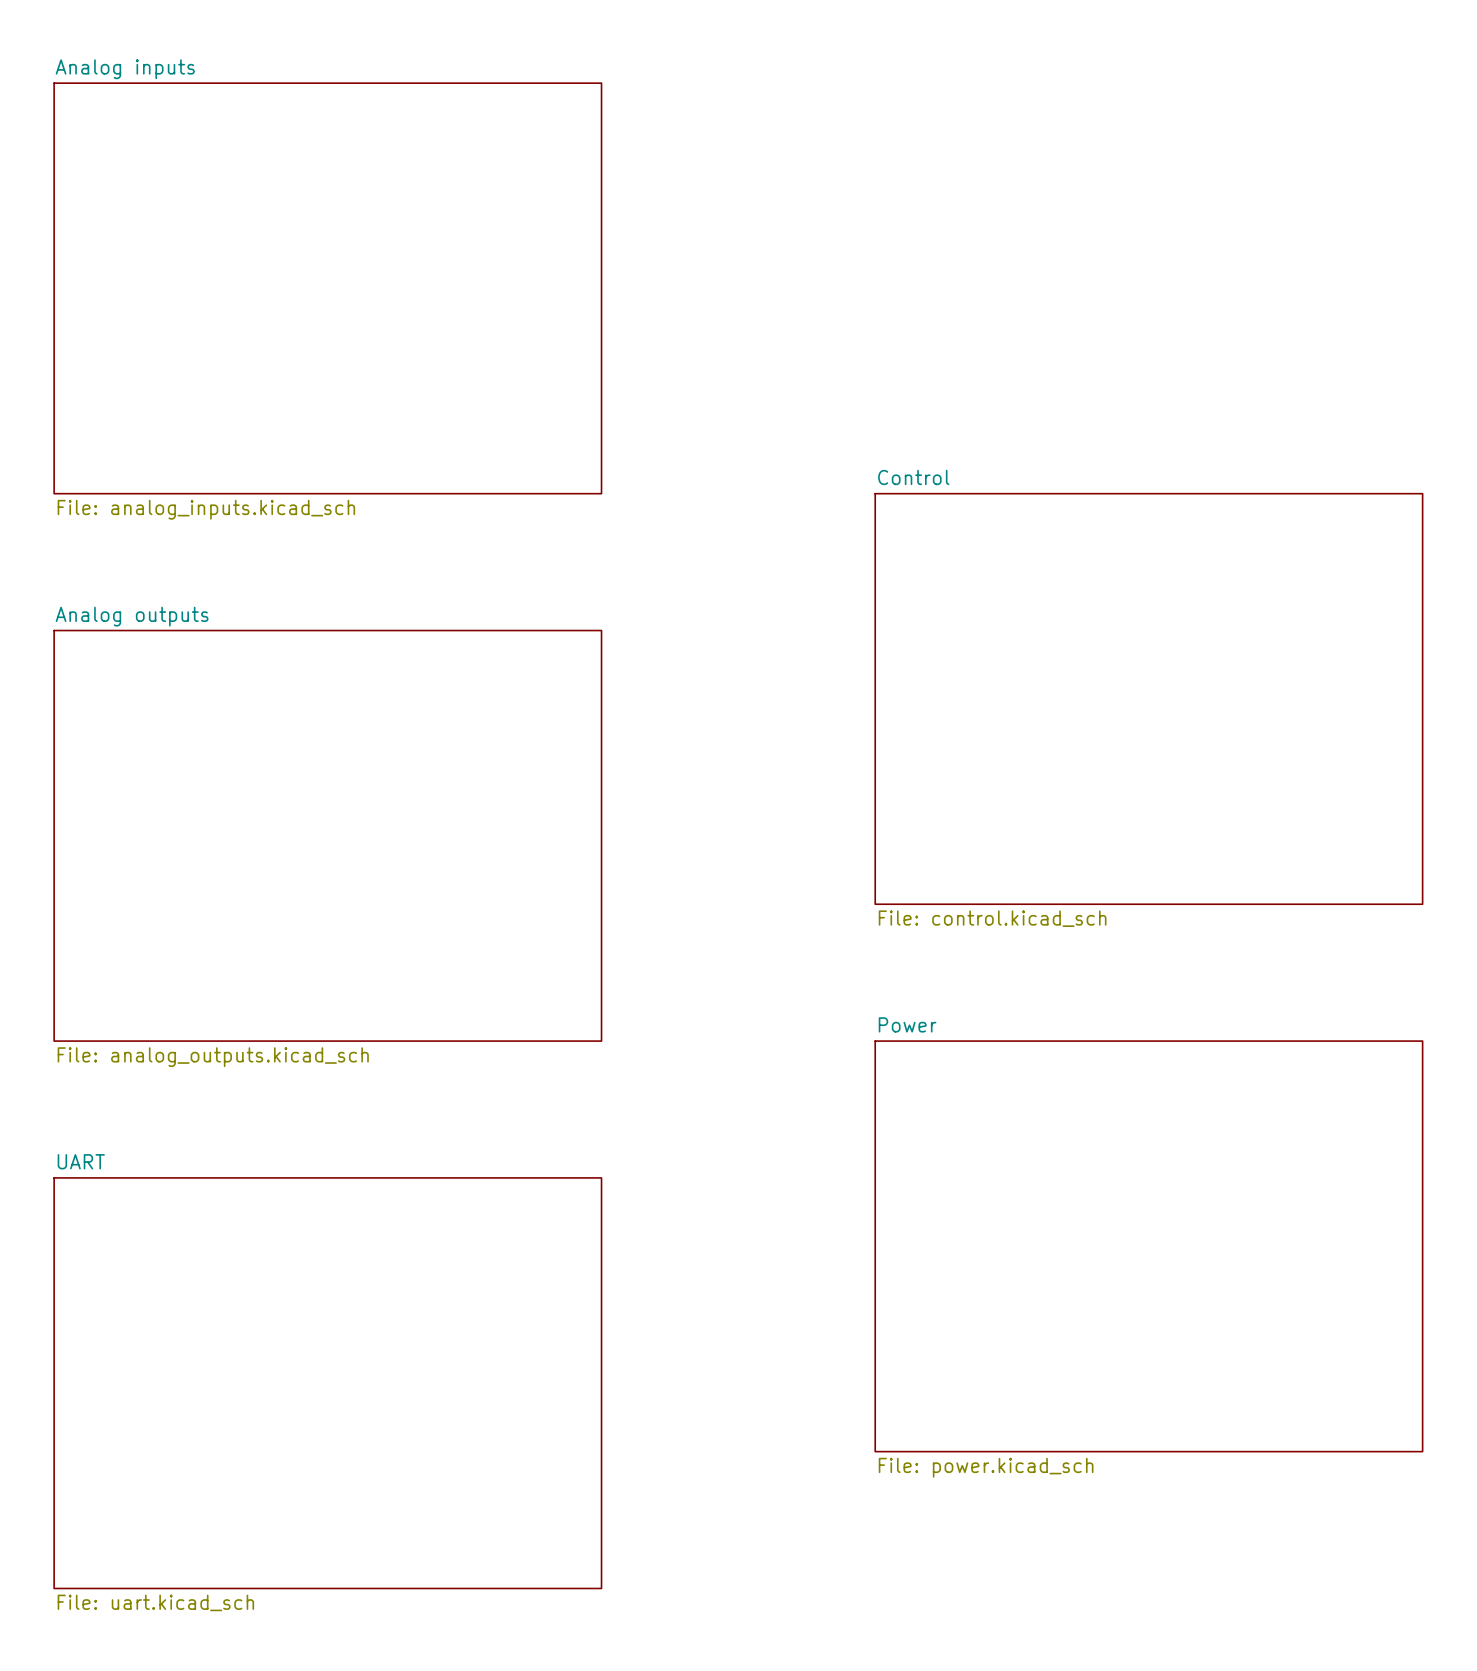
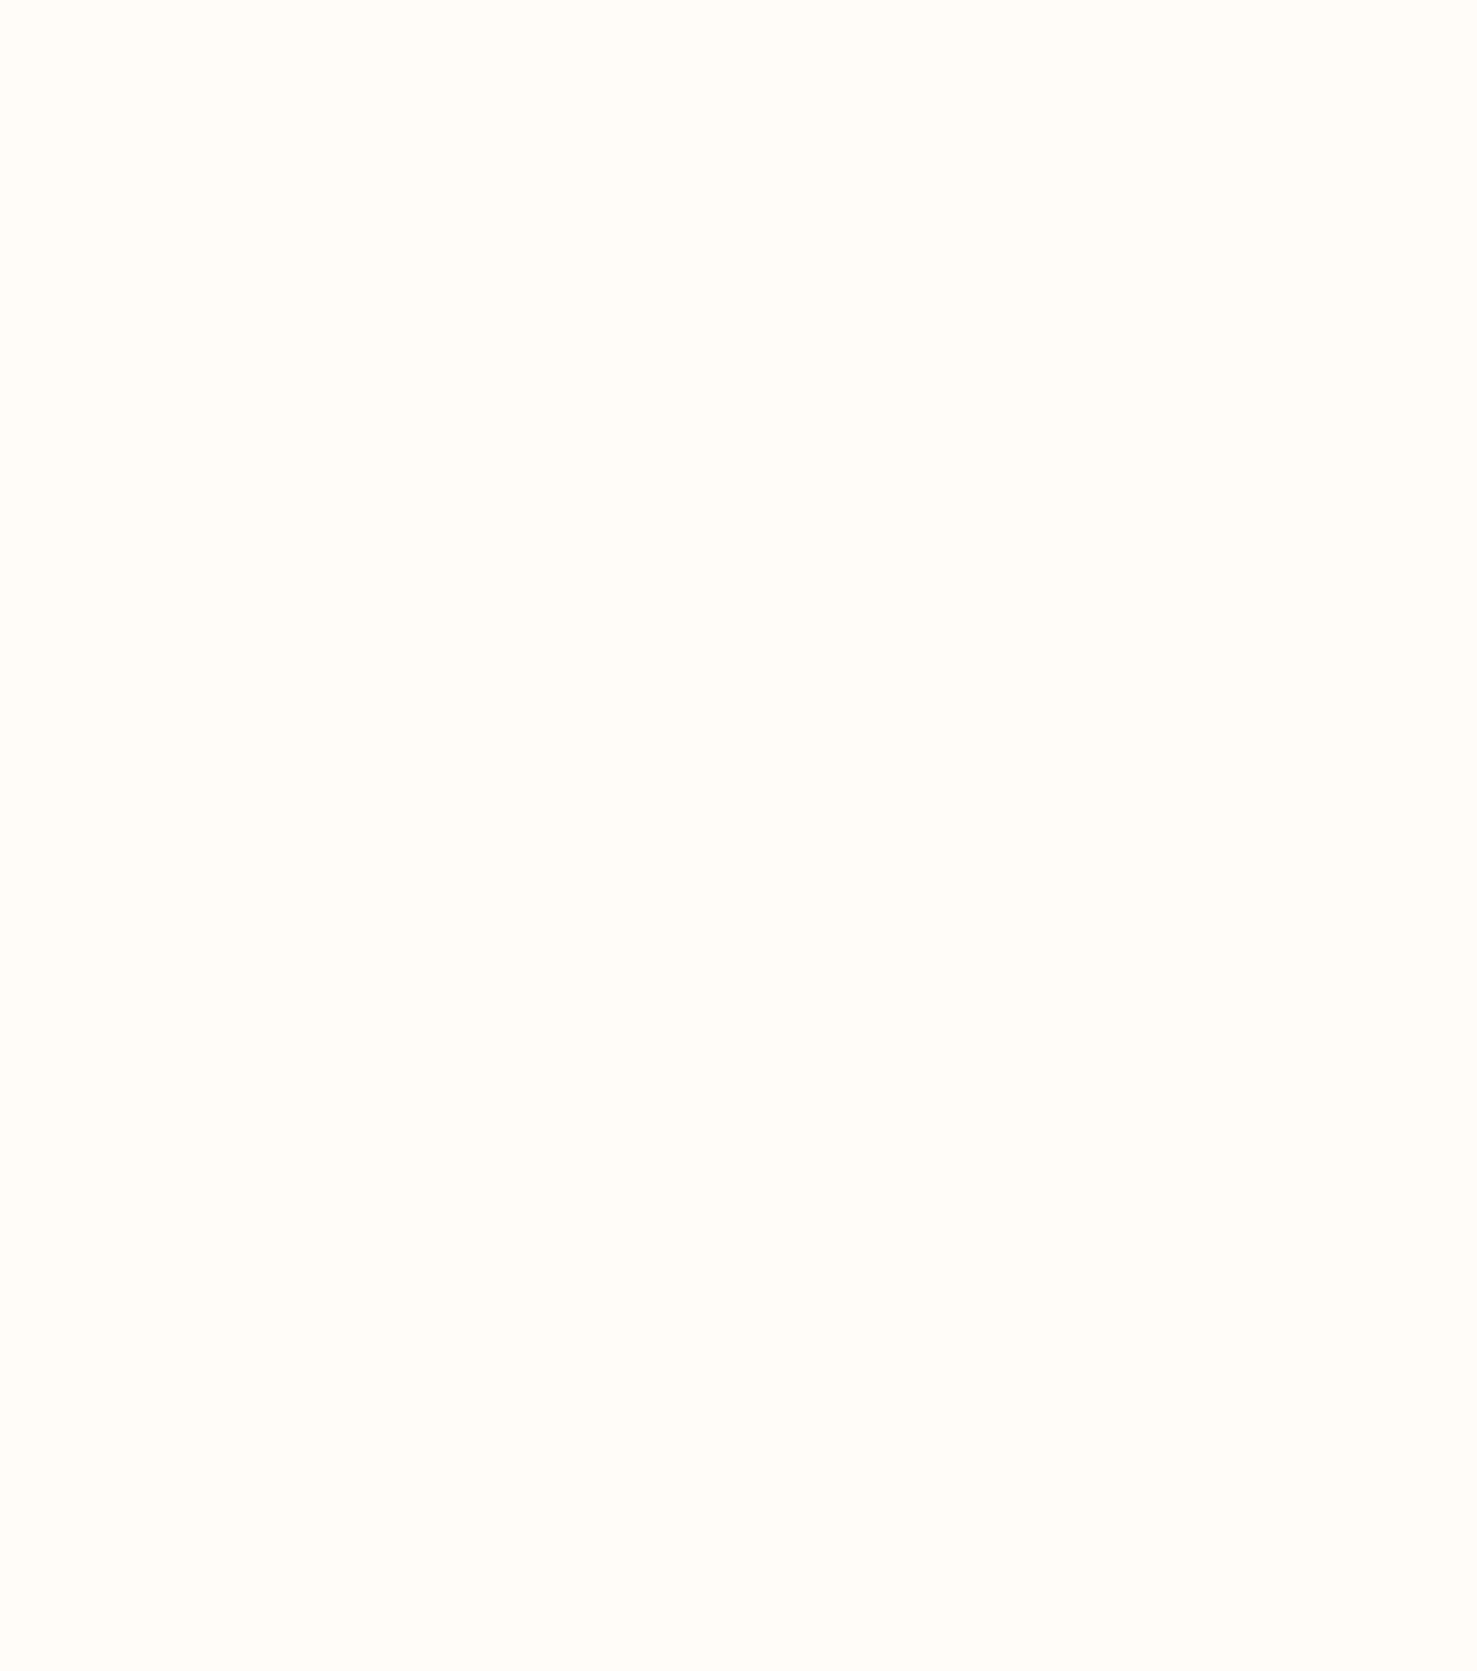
sheet Analog inputs: File: analog_inputs.kicad_sch (327, 288) -> none
sheet Control: File: control.kicad_sch (1148, 698) -> none
sheet Analog outputs: File: analog_outputs.kicad_sch (327, 835) -> none
sheet Power: File: power.kicad_sch (1148, 1246) -> none
sheet UART: File: uart.kicad_sch (327, 1383) -> none

